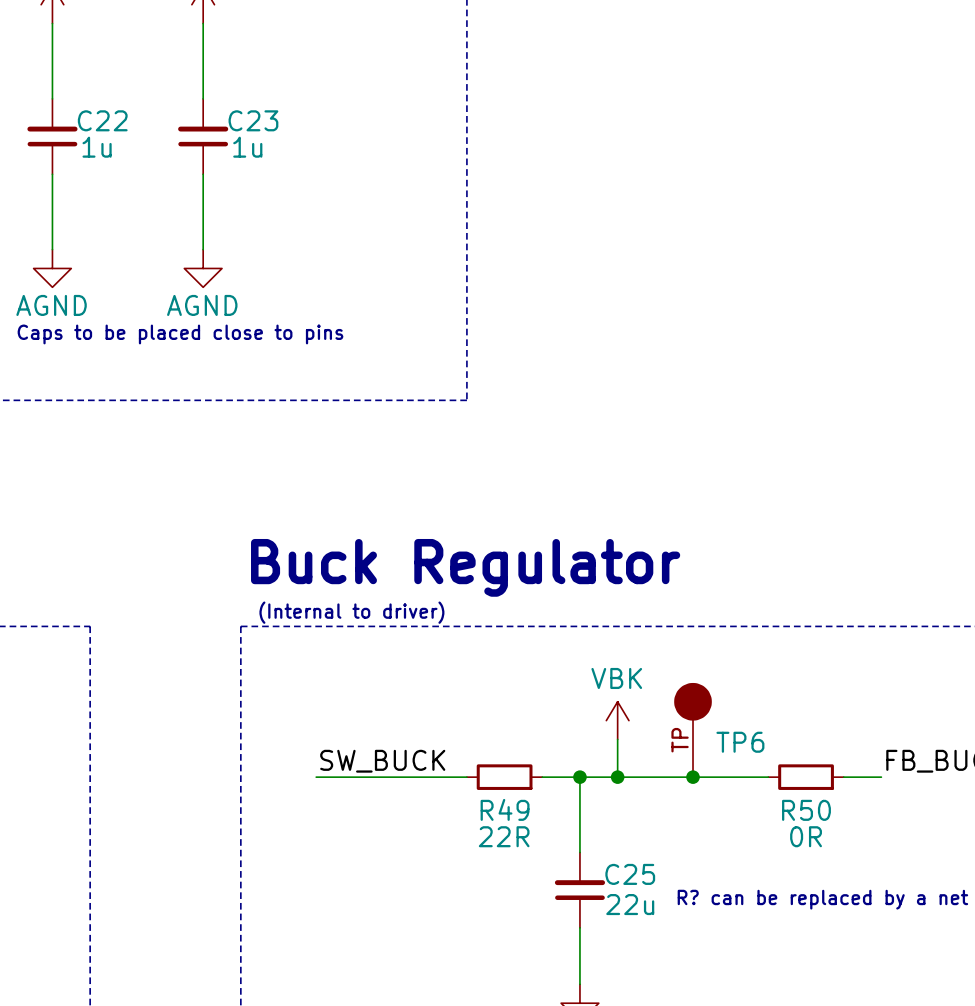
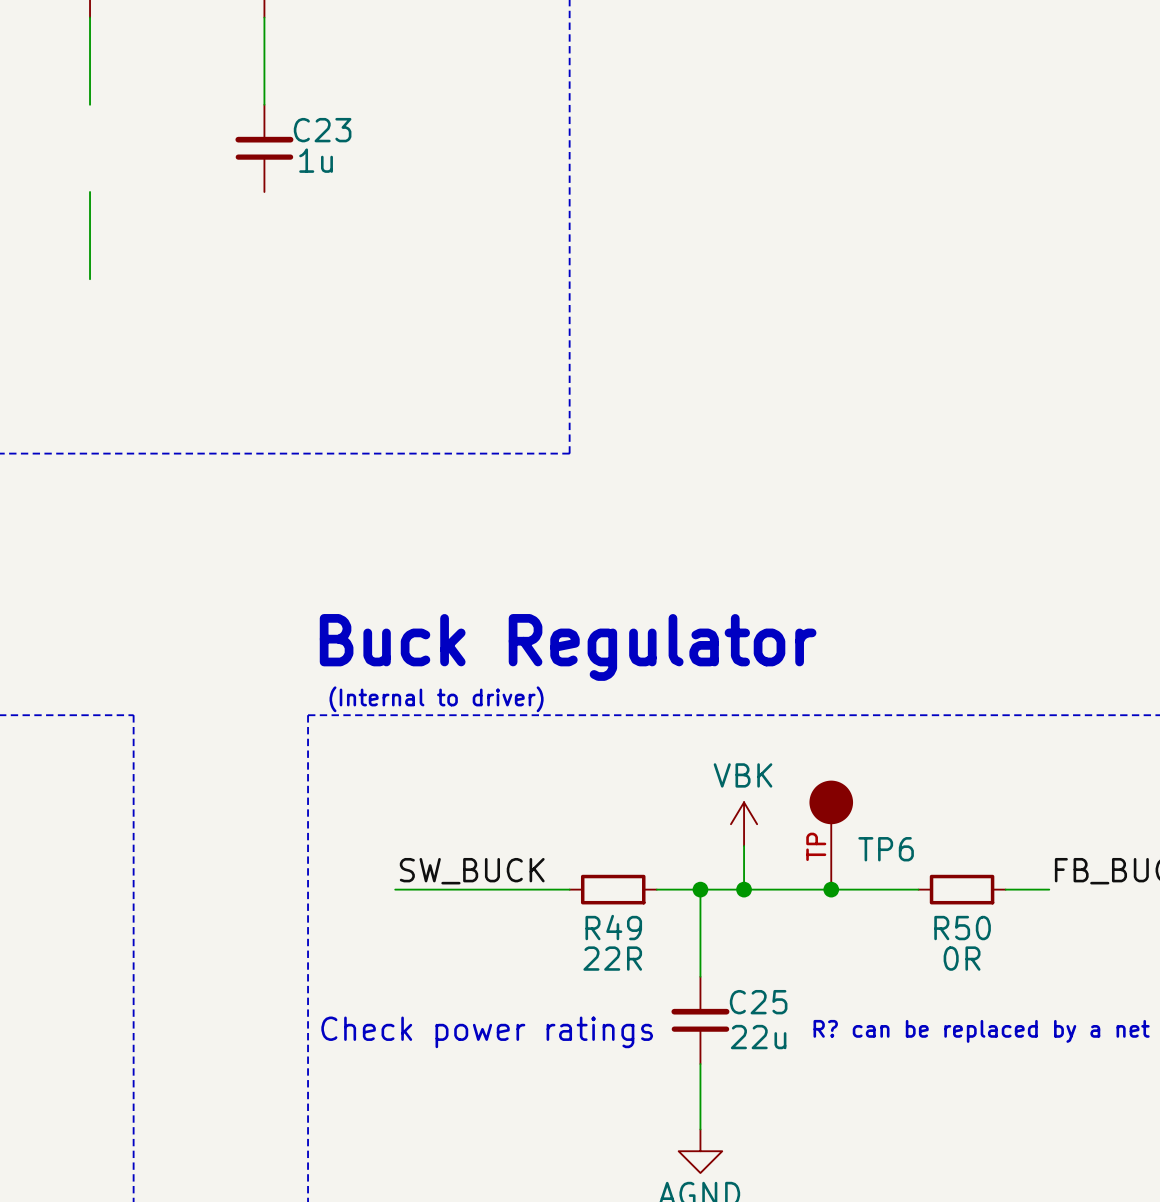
C22: 1u (52, 136) -> none
wire: (203, 174) (203, 249) -> none
power symbol: AGND (52, 268) -> none
power symbol: AGND (203, 268) -> none
text: Caps to be placed close to pins (180, 334) -> none
text: none -> Check power ratings (487, 1032)

